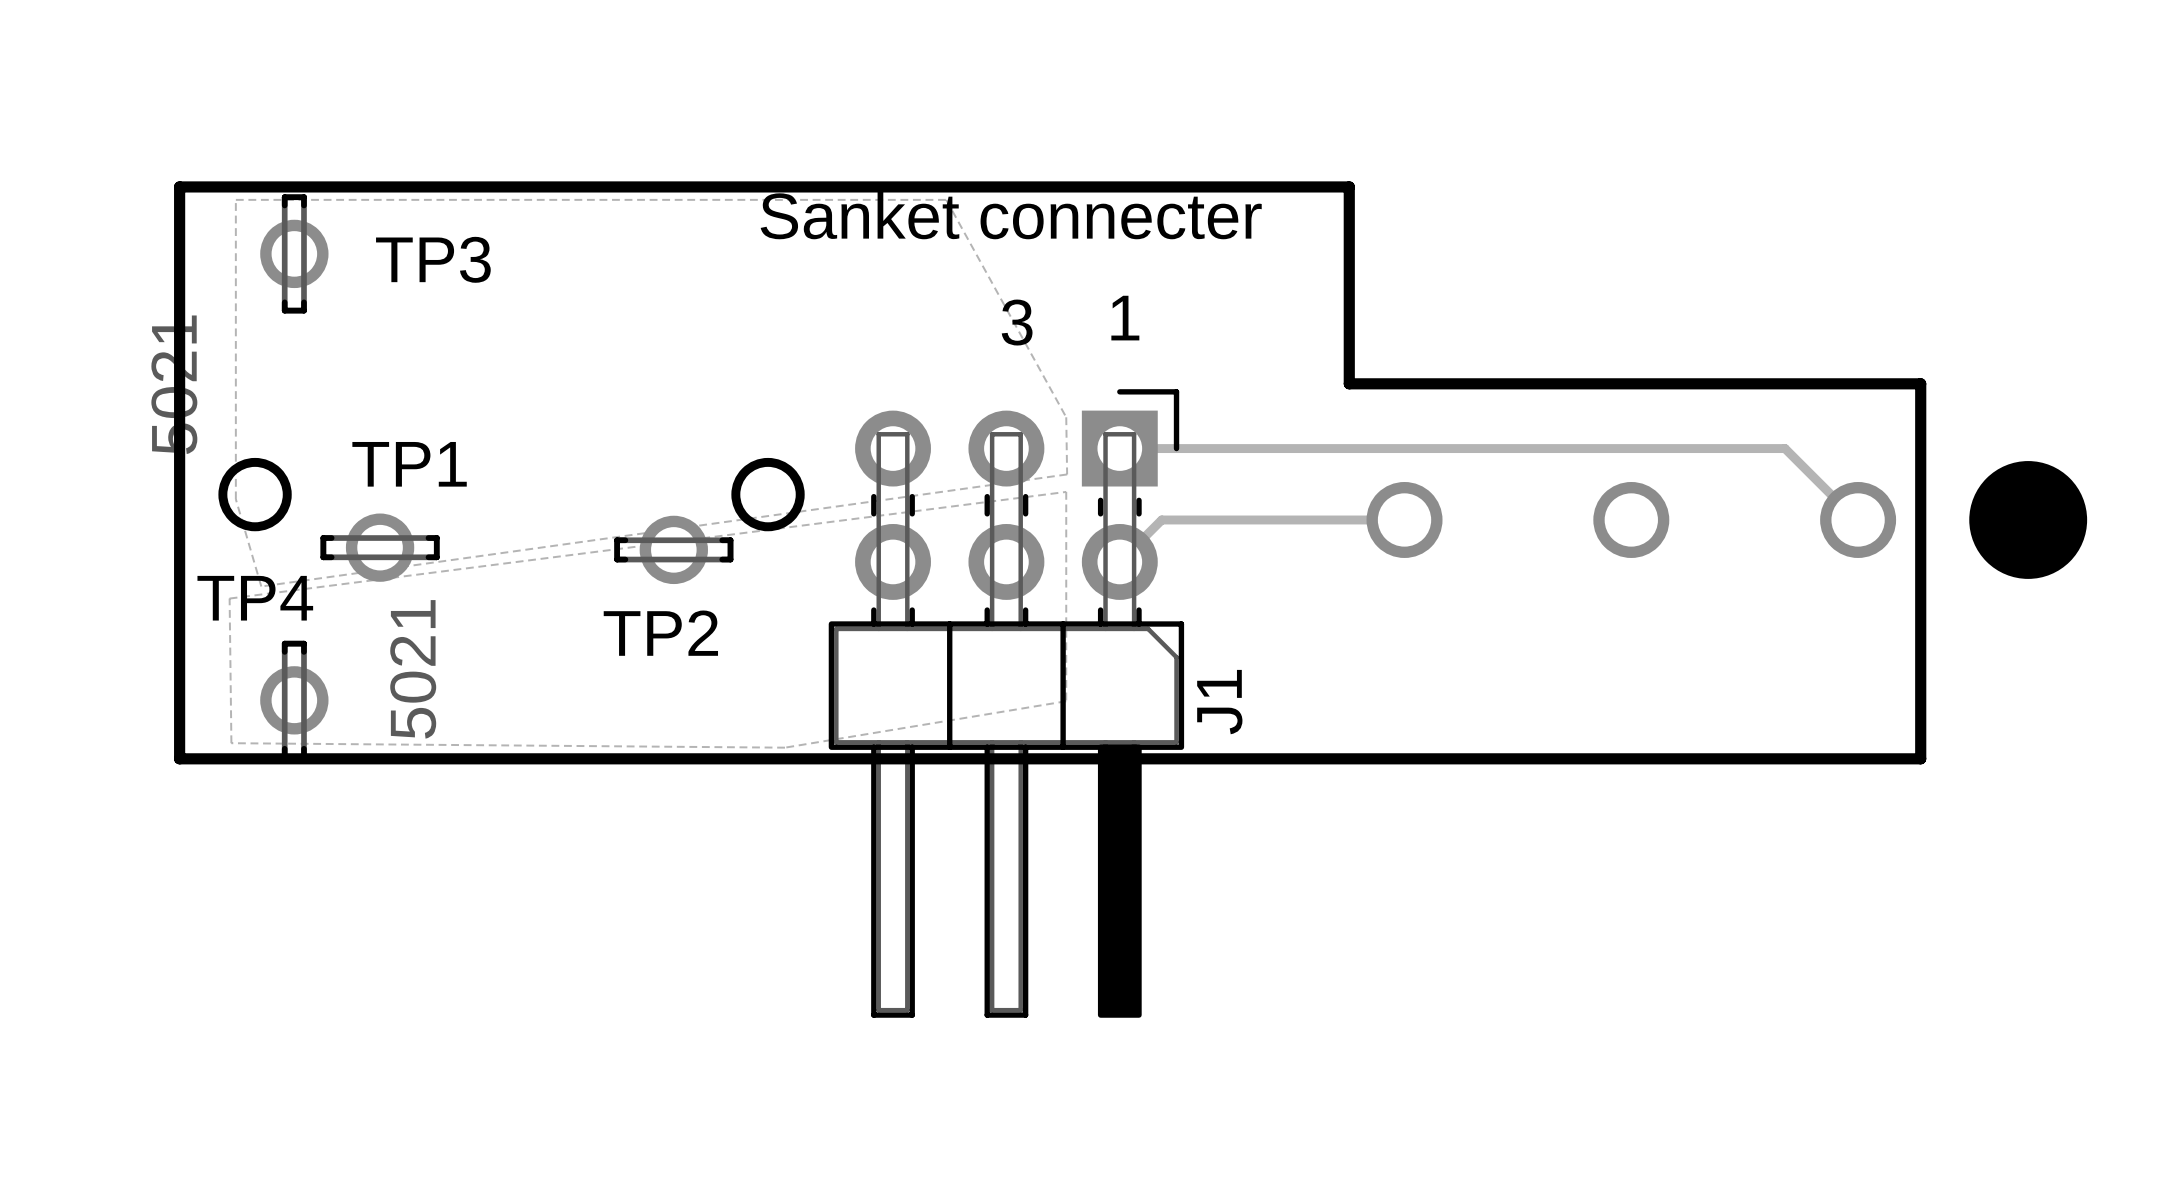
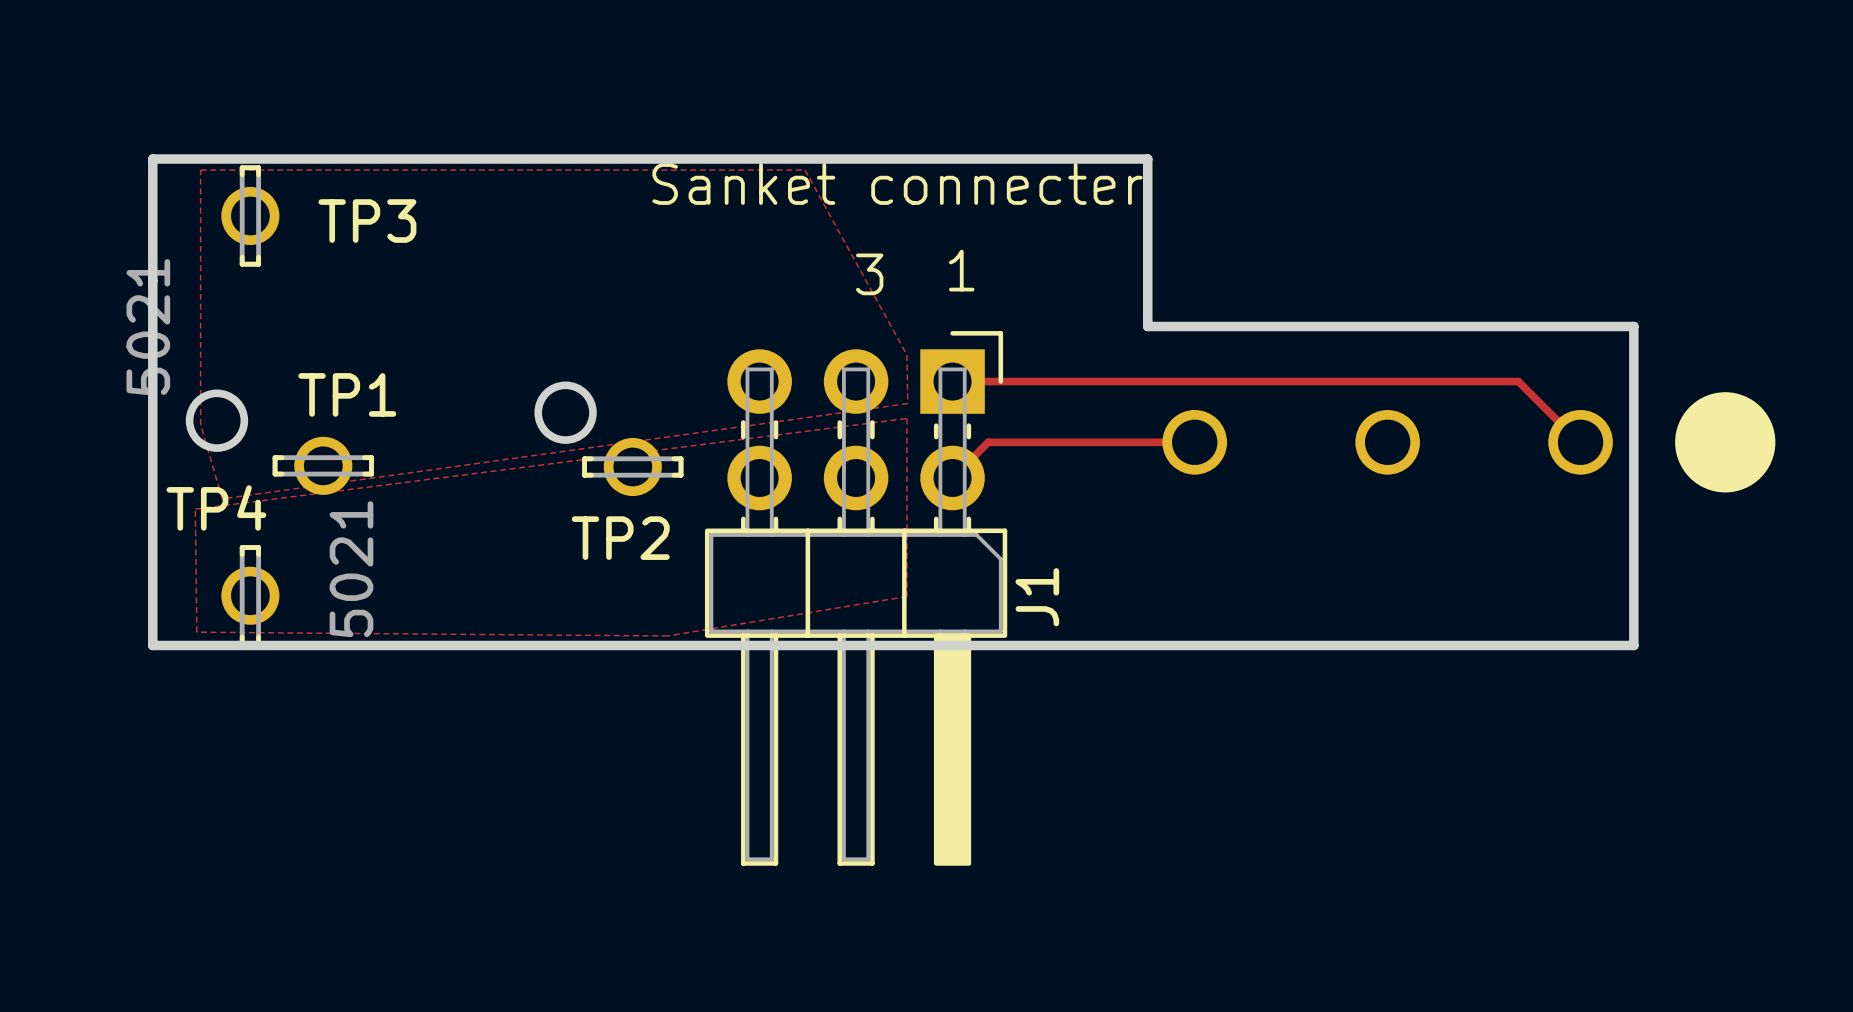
round board edge position: (768, 494) -> (565, 412)
TP2 position: (673, 549) -> (632, 467)

